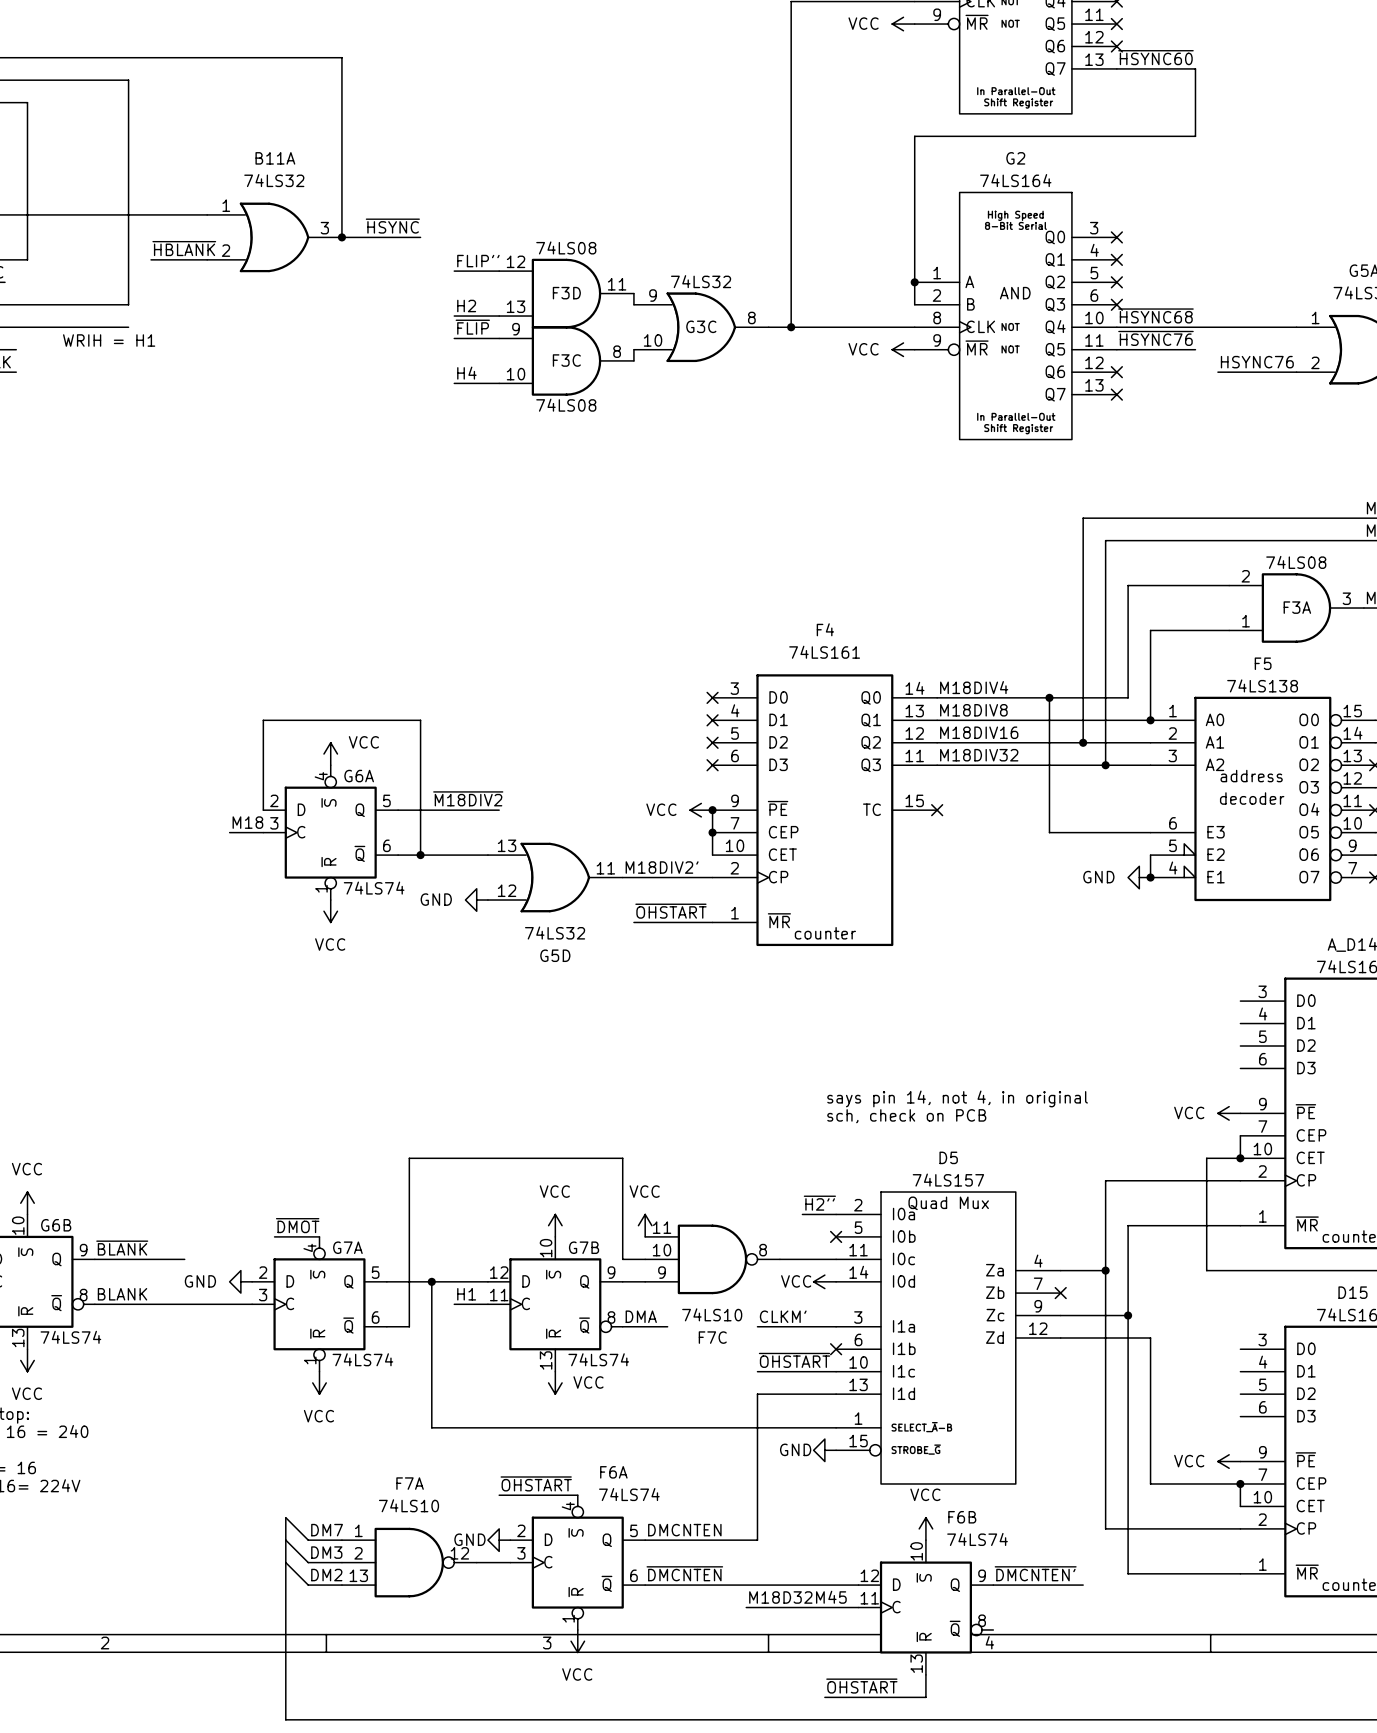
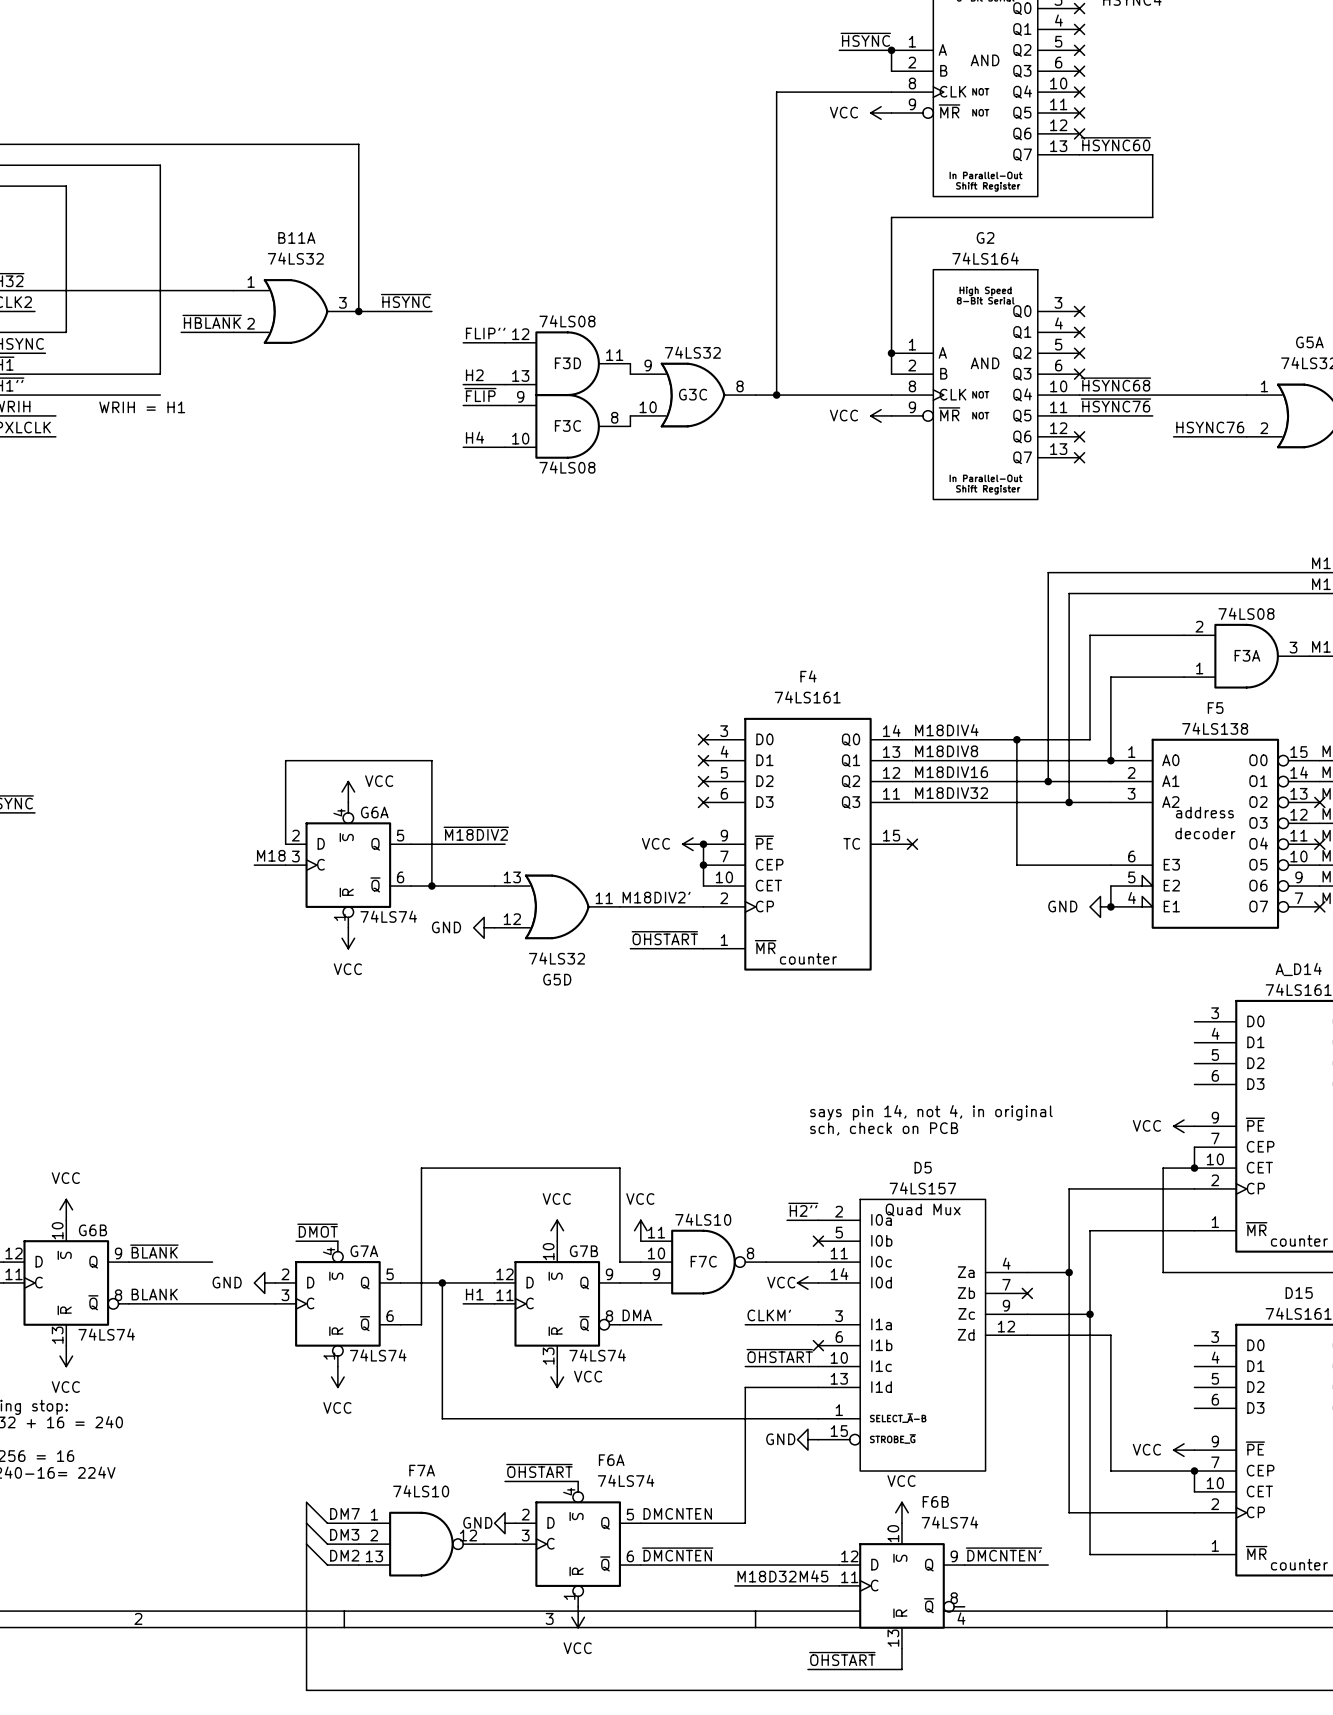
F7C value position: 74LS10 (712, 1314) -> 74LS10 (703, 1219)
F7C name position: F7C (712, 1337) -> F7C (703, 1261)

